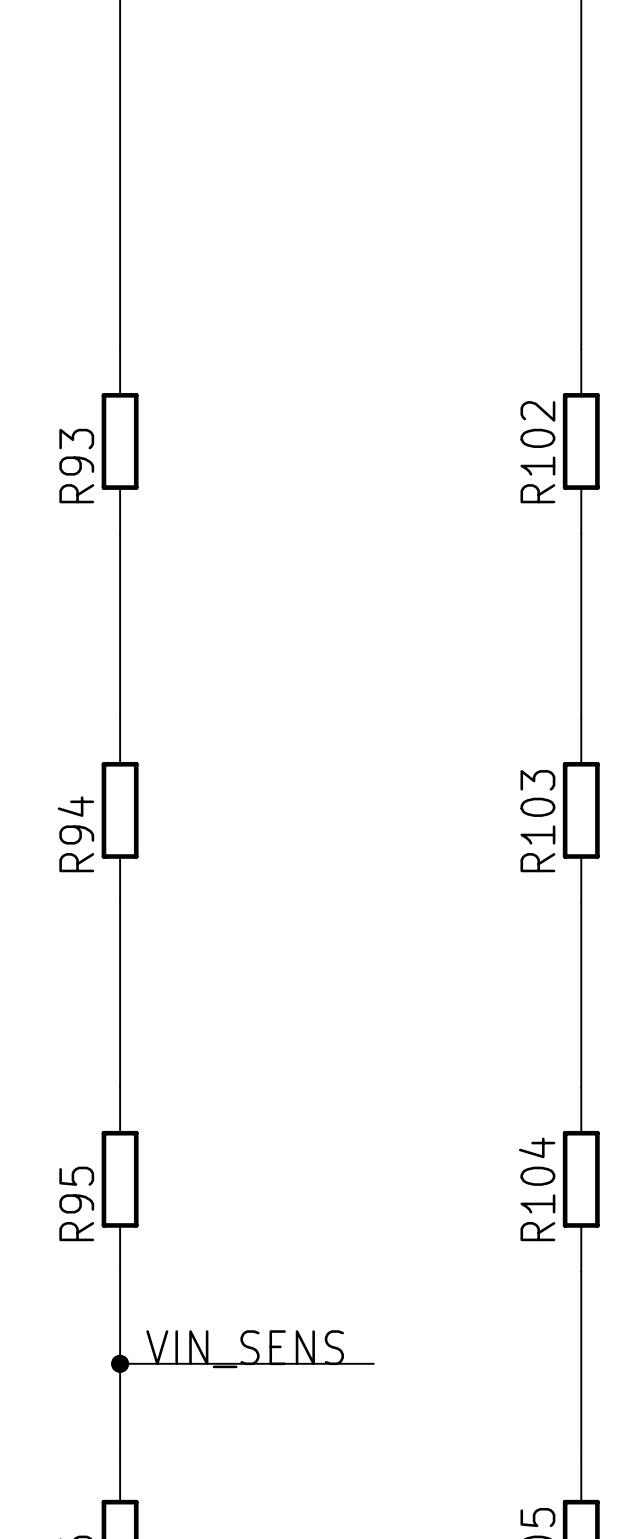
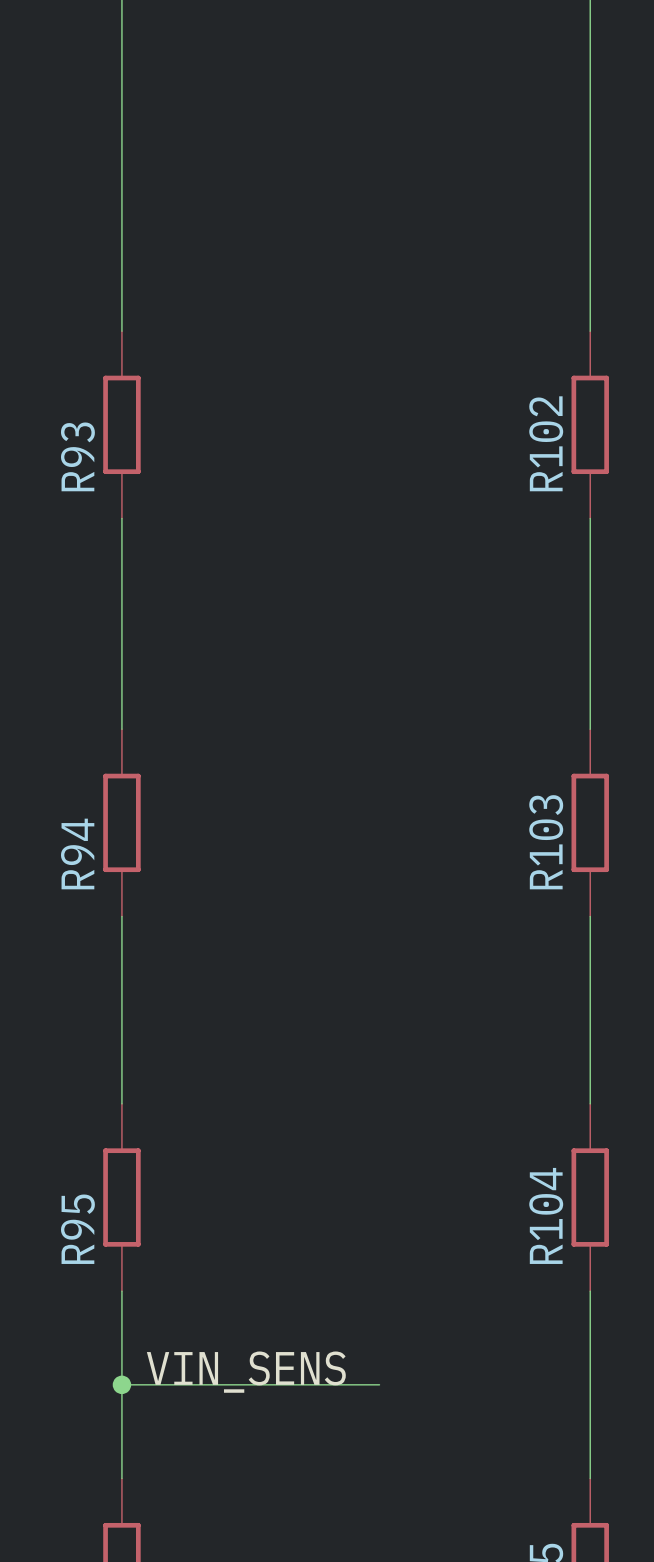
R93 position: (120, 441) -> (121, 424)
R102 position: (581, 441) -> (590, 424)

